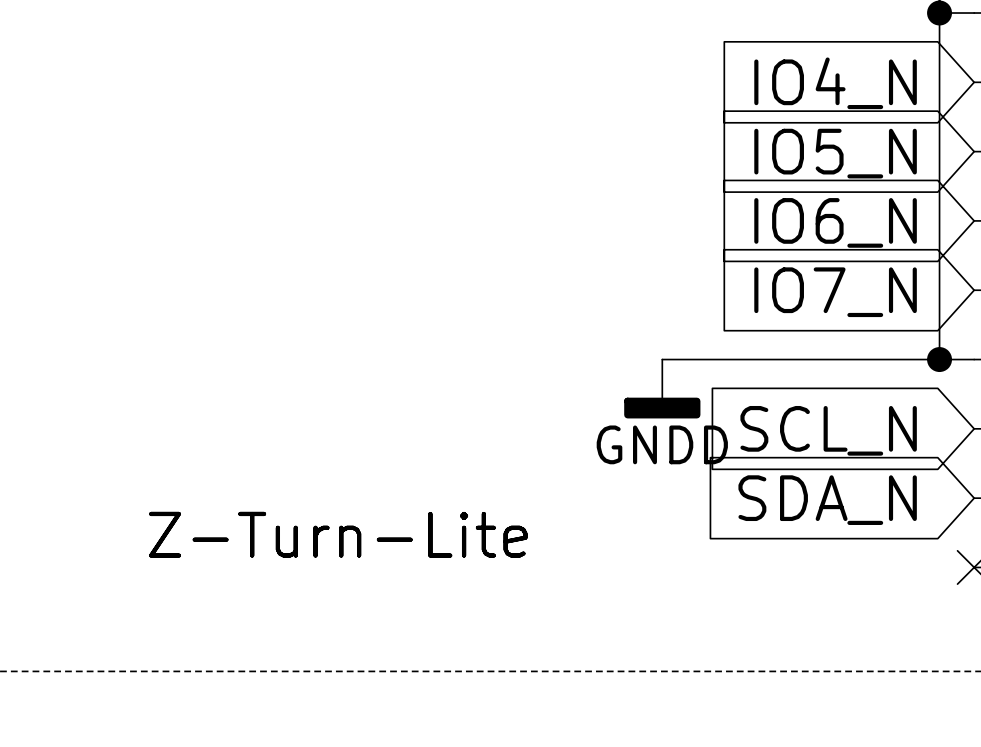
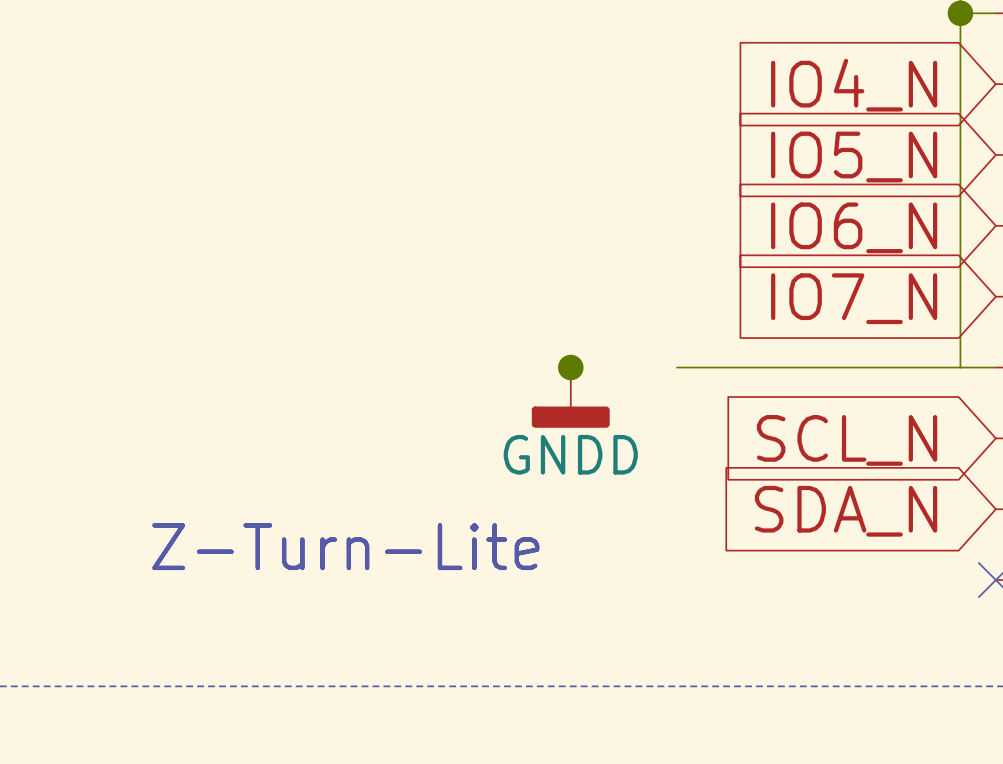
junction: none -> (570, 367)
junction: (939, 359) -> none
power symbol position: GNDD (662, 388) -> GNDD (570, 397)

